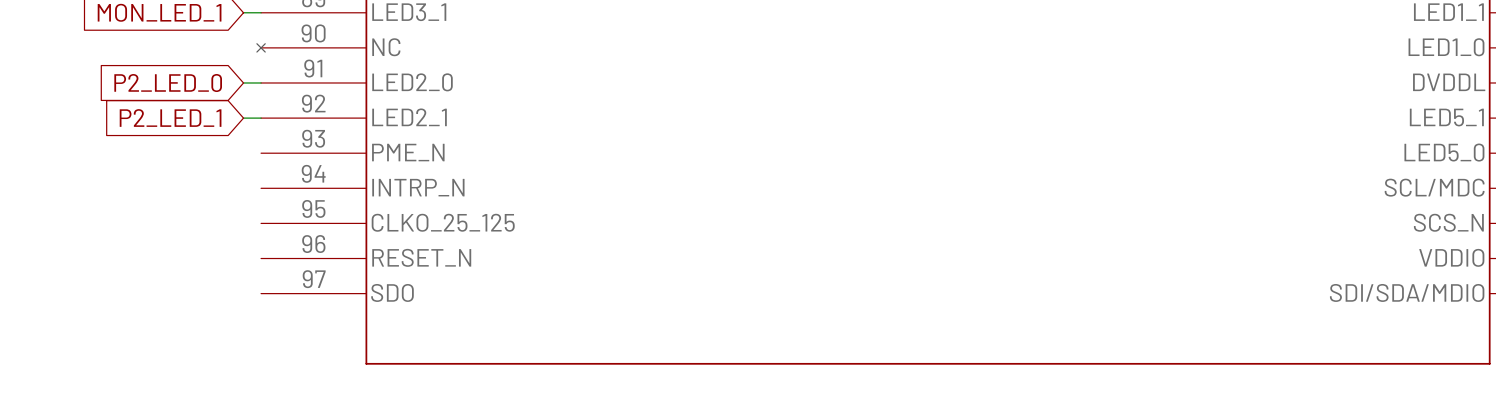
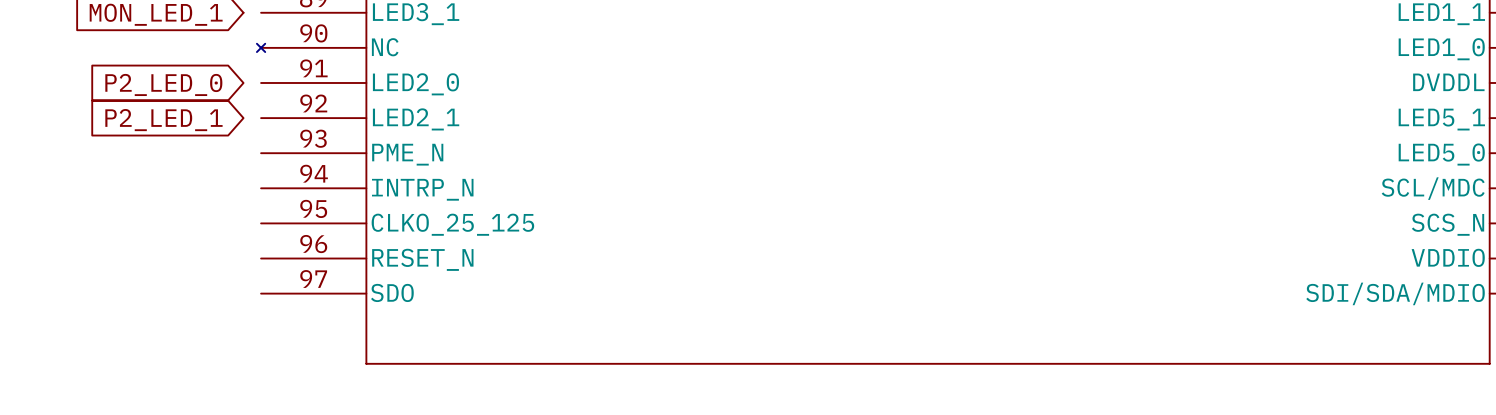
wire: (243, 12) (261, 12) -> none
wire: (243, 82) (261, 82) -> none
wire: (243, 118) (261, 118) -> none

